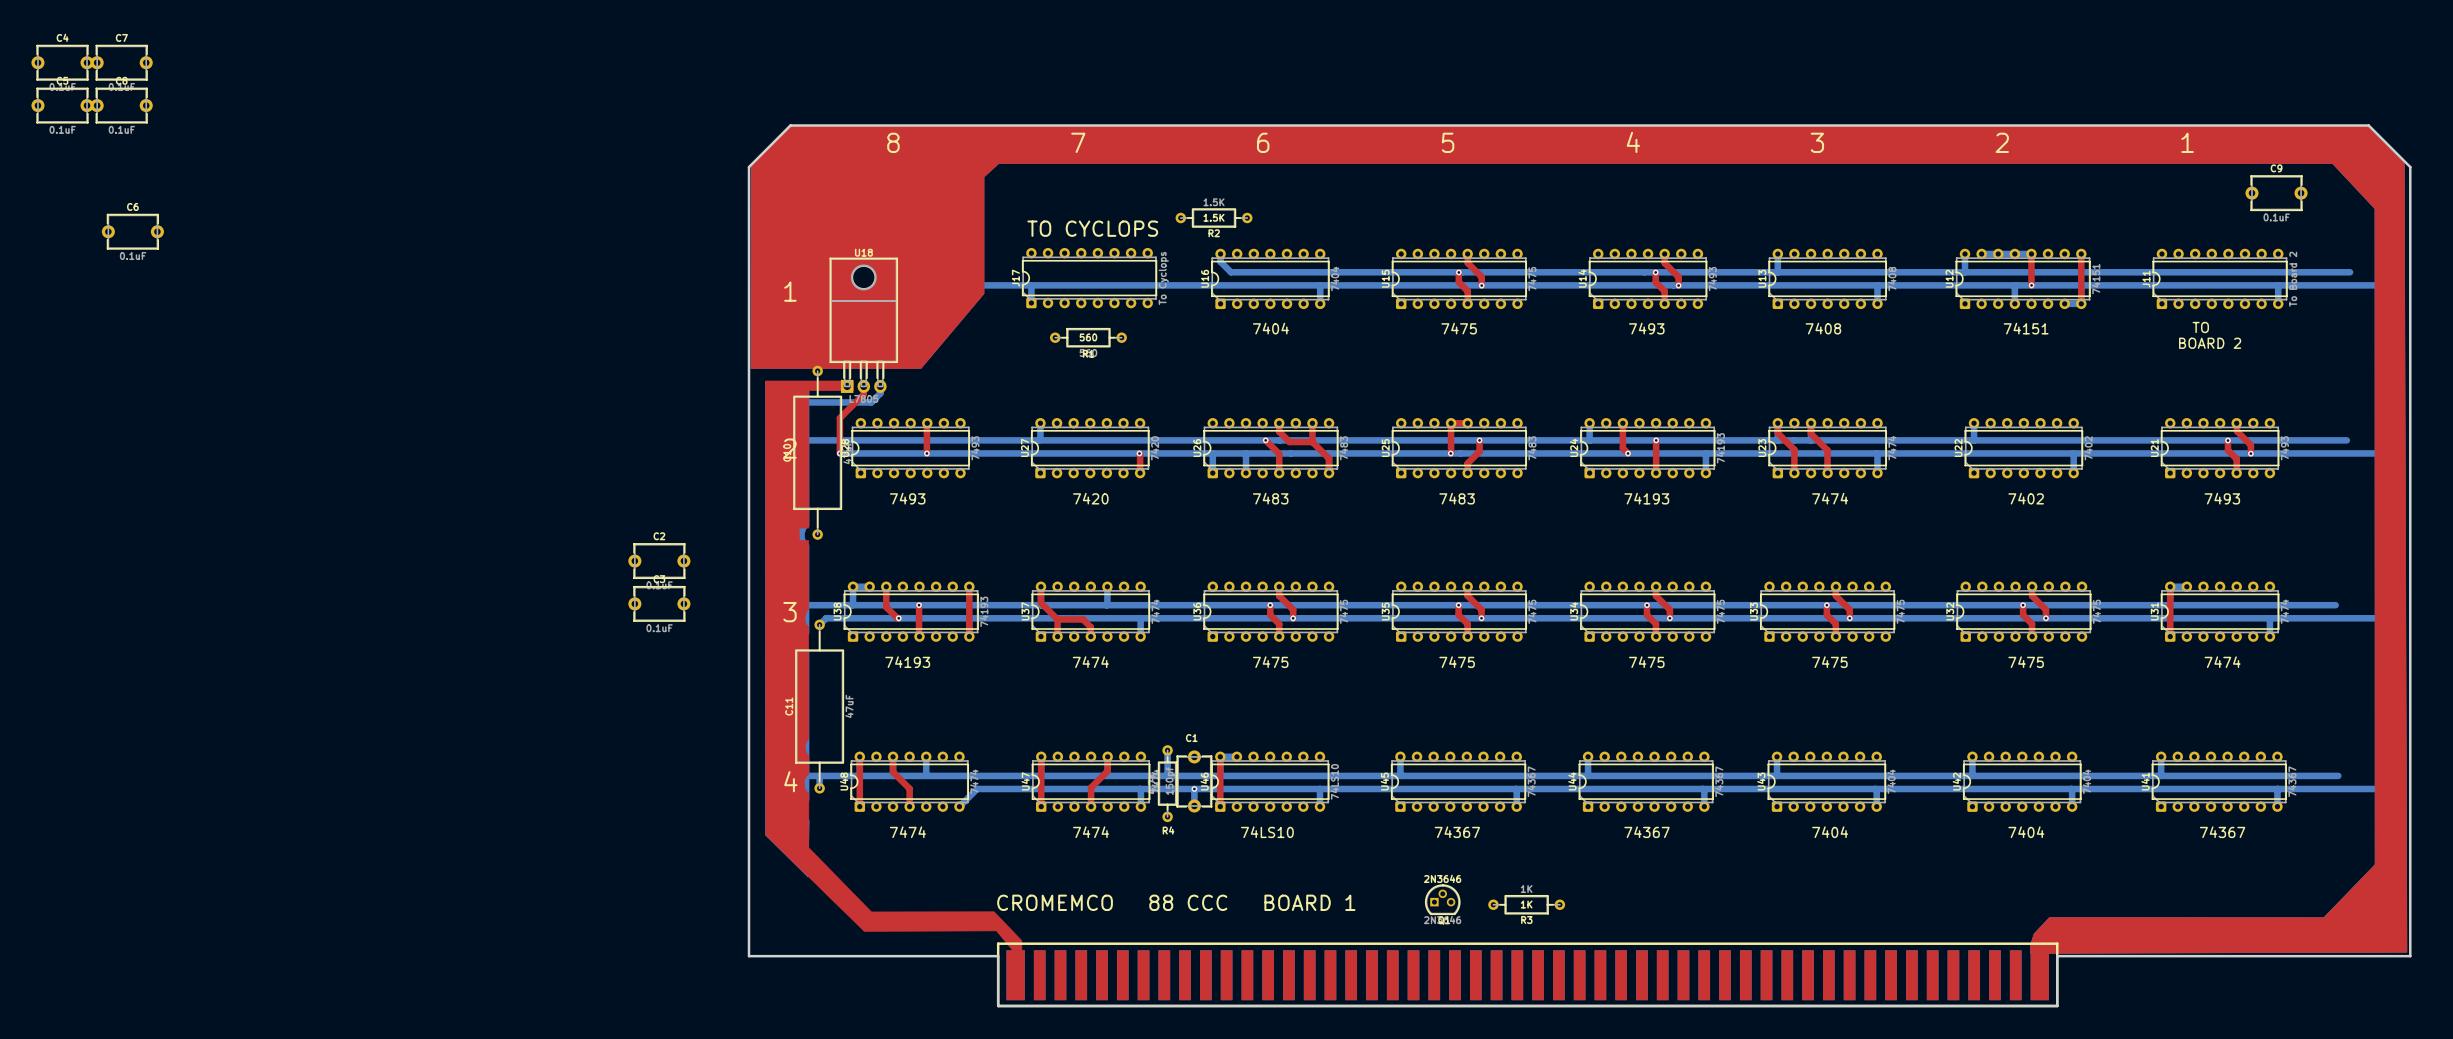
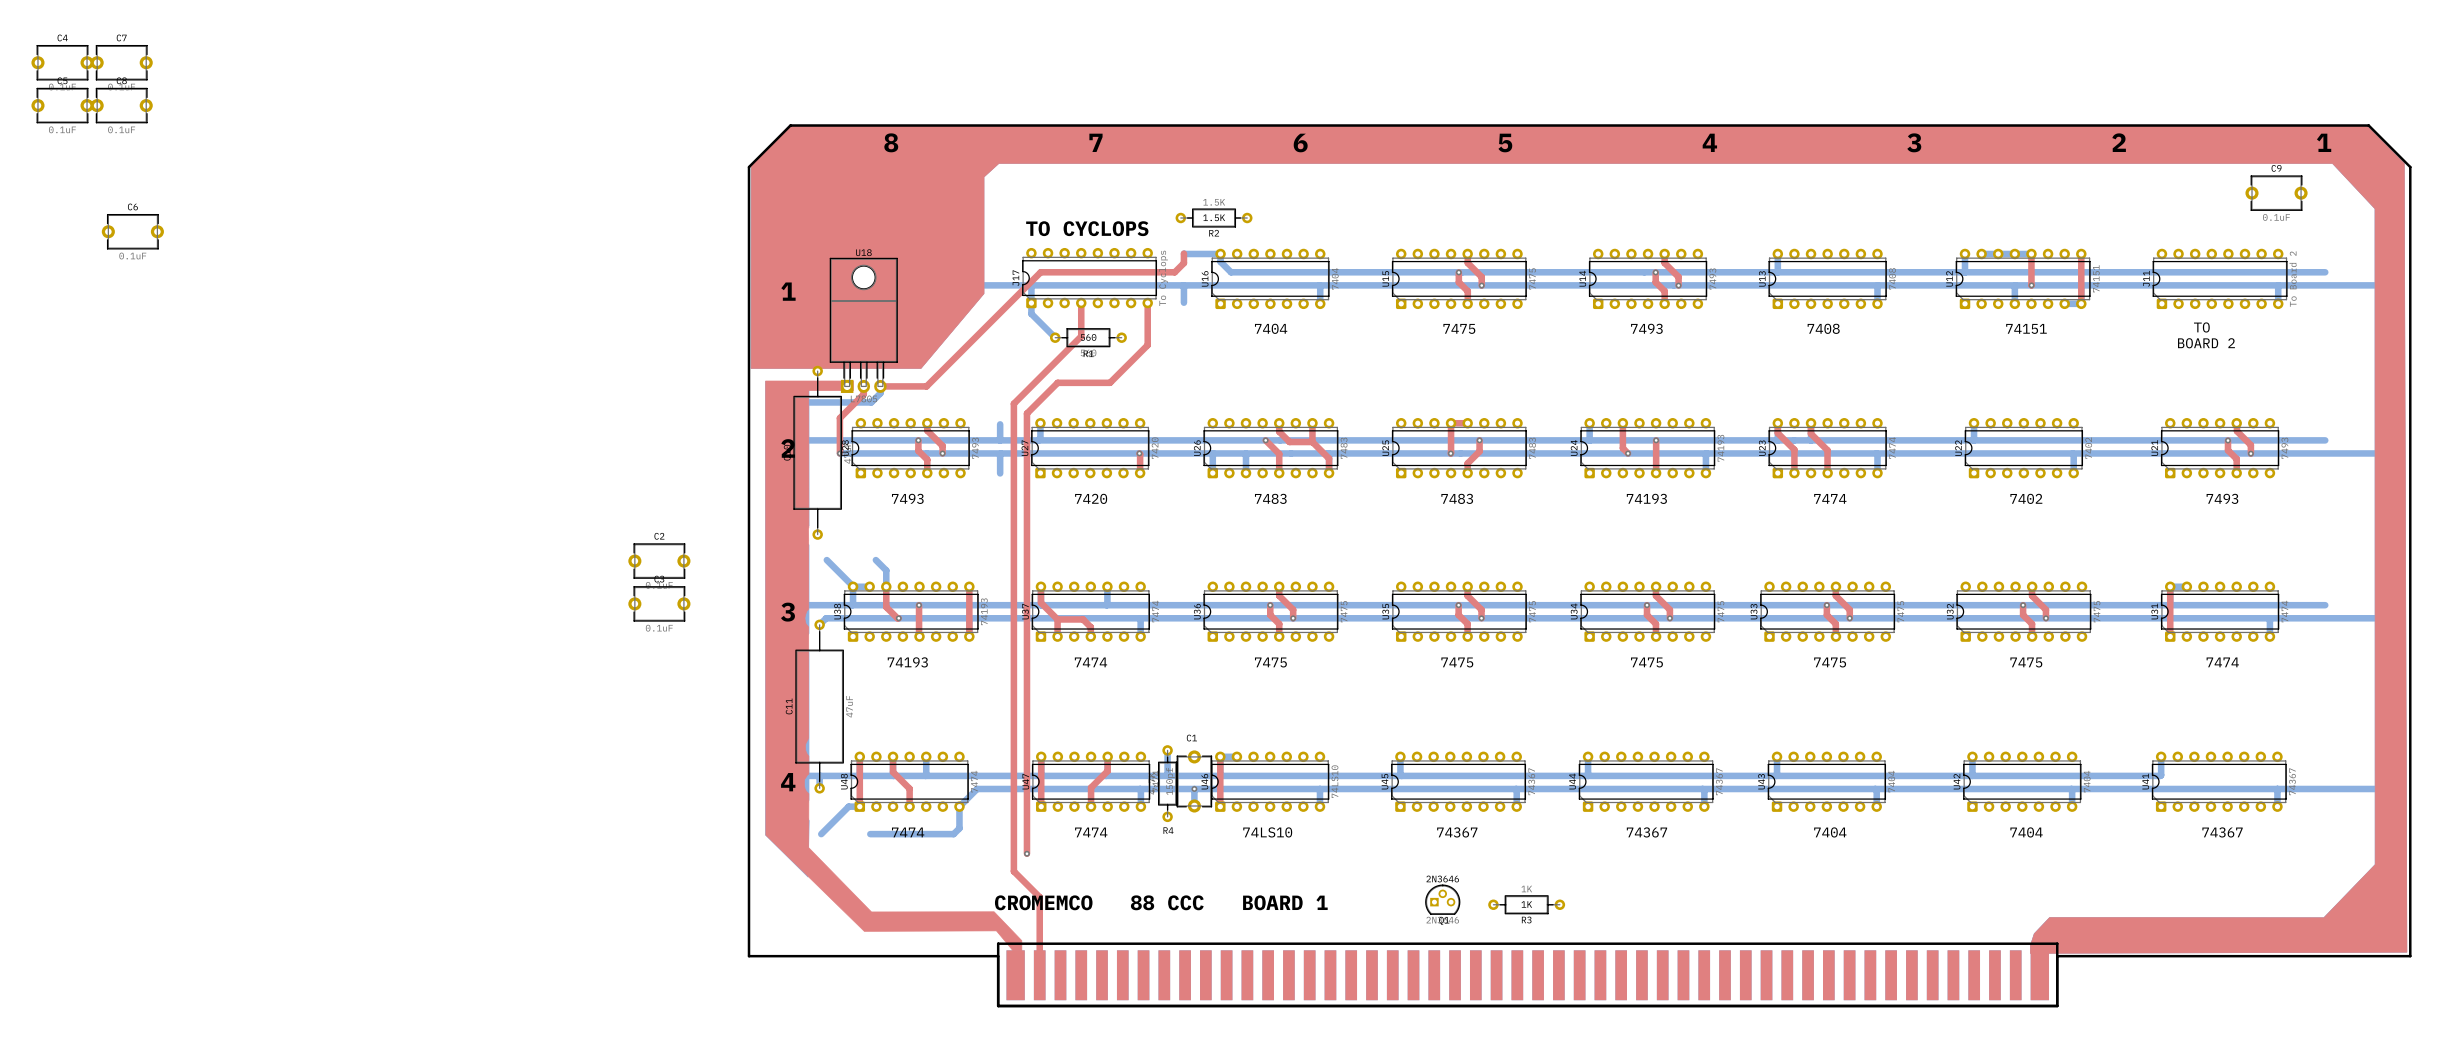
top track: none -> (1183, 253) (1183, 263) (1174, 272) (1040, 272) (926, 386) (880, 386)
bottom track: none -> (1183, 253) (1220, 253)
bottom track: (2325, 272) (2350, 272) -> none
bottom track: none -> (1183, 285) (1183, 302)
bottom track: none -> (1031, 303) (1031, 313) (1055, 337)
top track: none -> (1081, 303) (1081, 336) (1013, 403) (1013, 871) (1039, 897) (1039, 975)
top track: none -> (1147, 303) (1147, 345) (1110, 382) (1057, 382) (1026, 413) (1026, 853)
drawing shape: [765, 380, 1023, 952] -> [765, 380, 1023, 952]
top track: none -> (927, 421) (927, 430) (942, 445) (942, 453)
top track: (926, 423) (926, 453) -> none
bottom track: none -> (1000, 424) (1000, 440)
top track: none -> (918, 440) (918, 450) (927, 459) (927, 473)
via: none -> (918, 440)
bottom track: (2325, 440) (2346, 440) -> none
via: (926, 453) -> none
via: none -> (942, 453)
bottom track: none -> (1000, 453) (1000, 473)
bottom track: none -> (826, 560) (853, 586)
bottom track: none -> (875, 560) (886, 570) (886, 586)
bottom track: (2325, 605) (2335, 605) -> none
bottom track: (2160, 775) (2338, 775) -> none
bottom track: none -> (859, 806) (848, 806) (821, 834)
bottom track: none -> (959, 806) (959, 828) (953, 834) (870, 834)
via: none -> (1026, 853)

